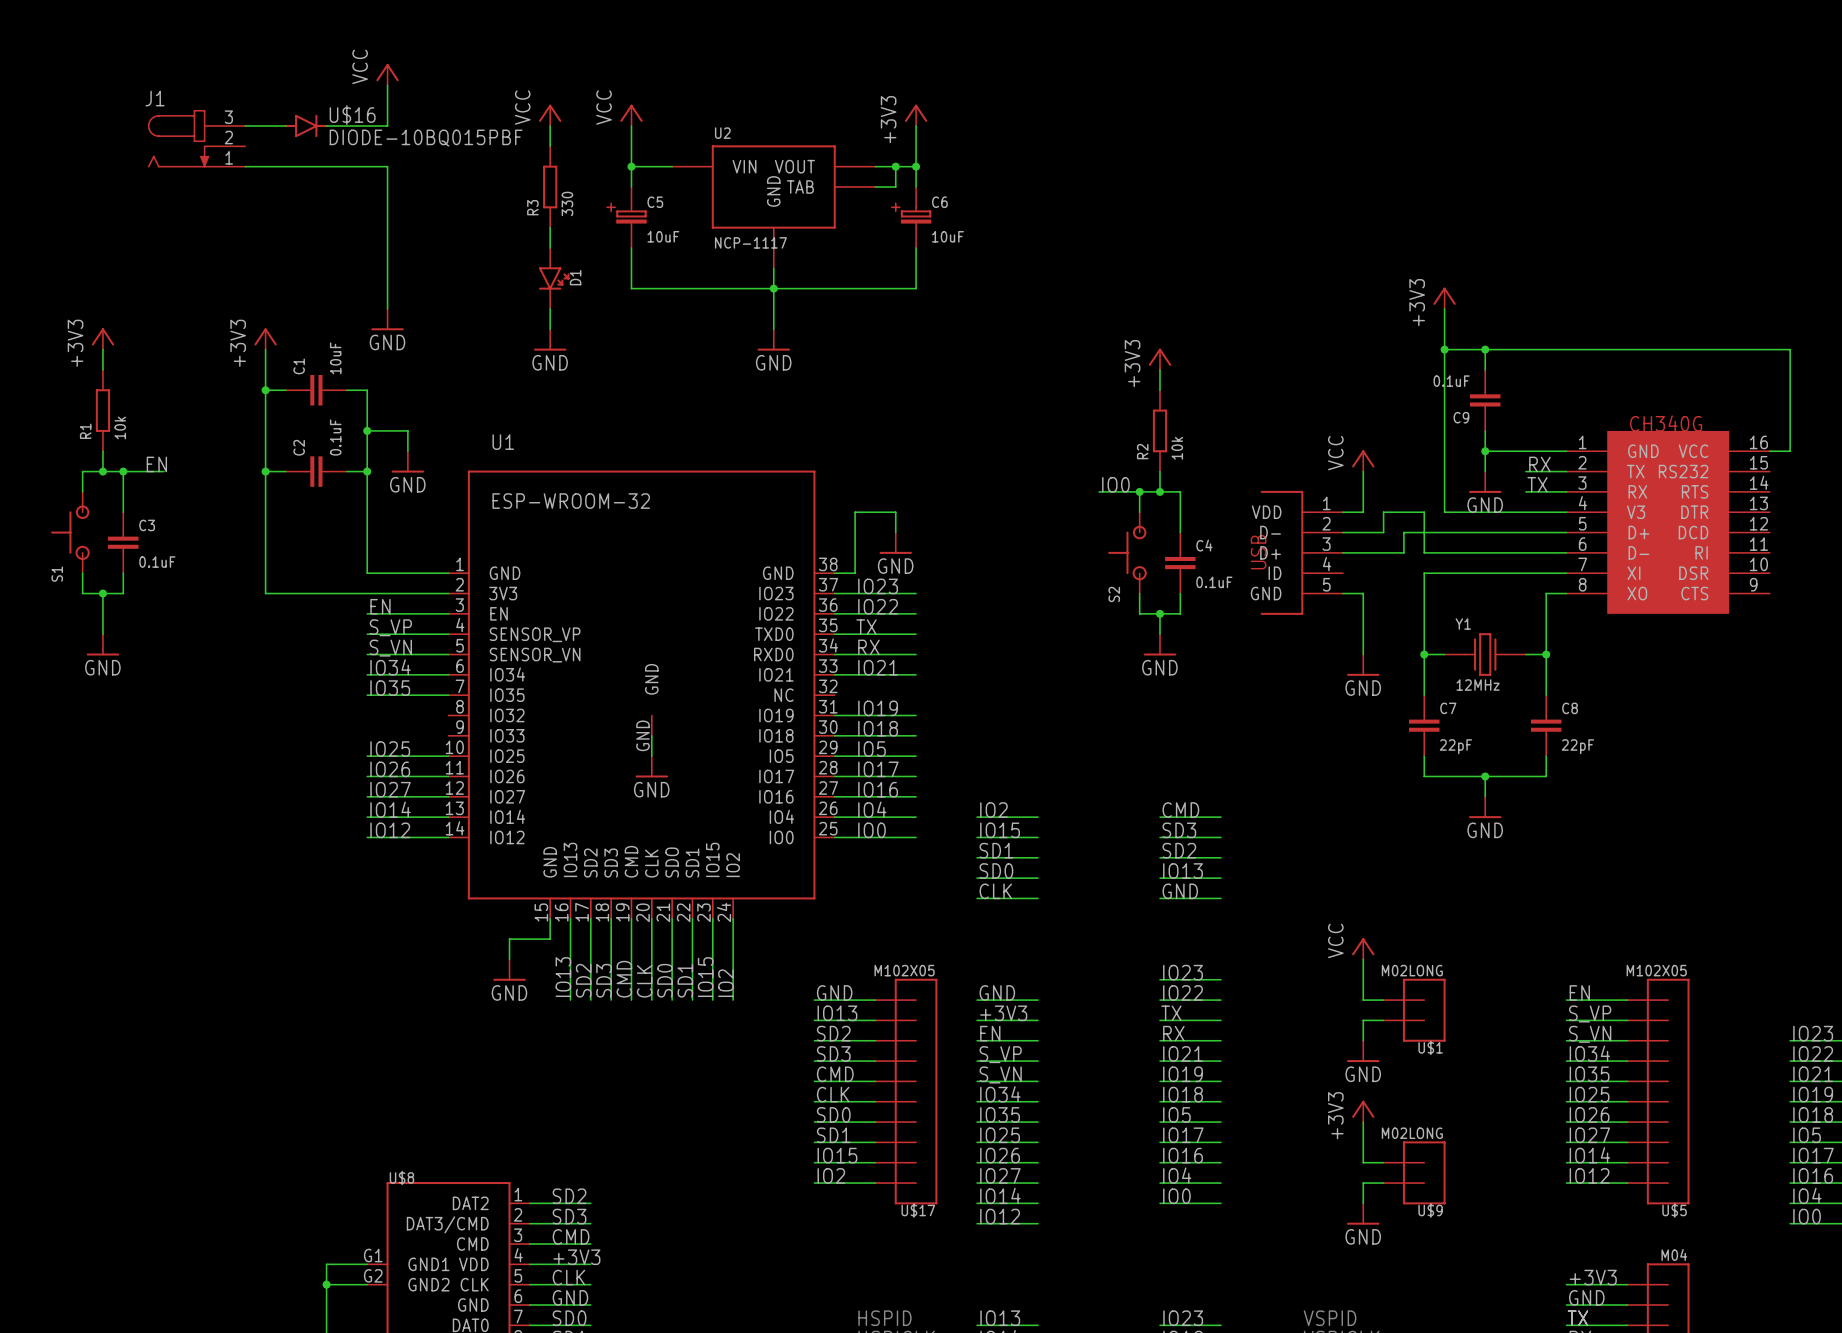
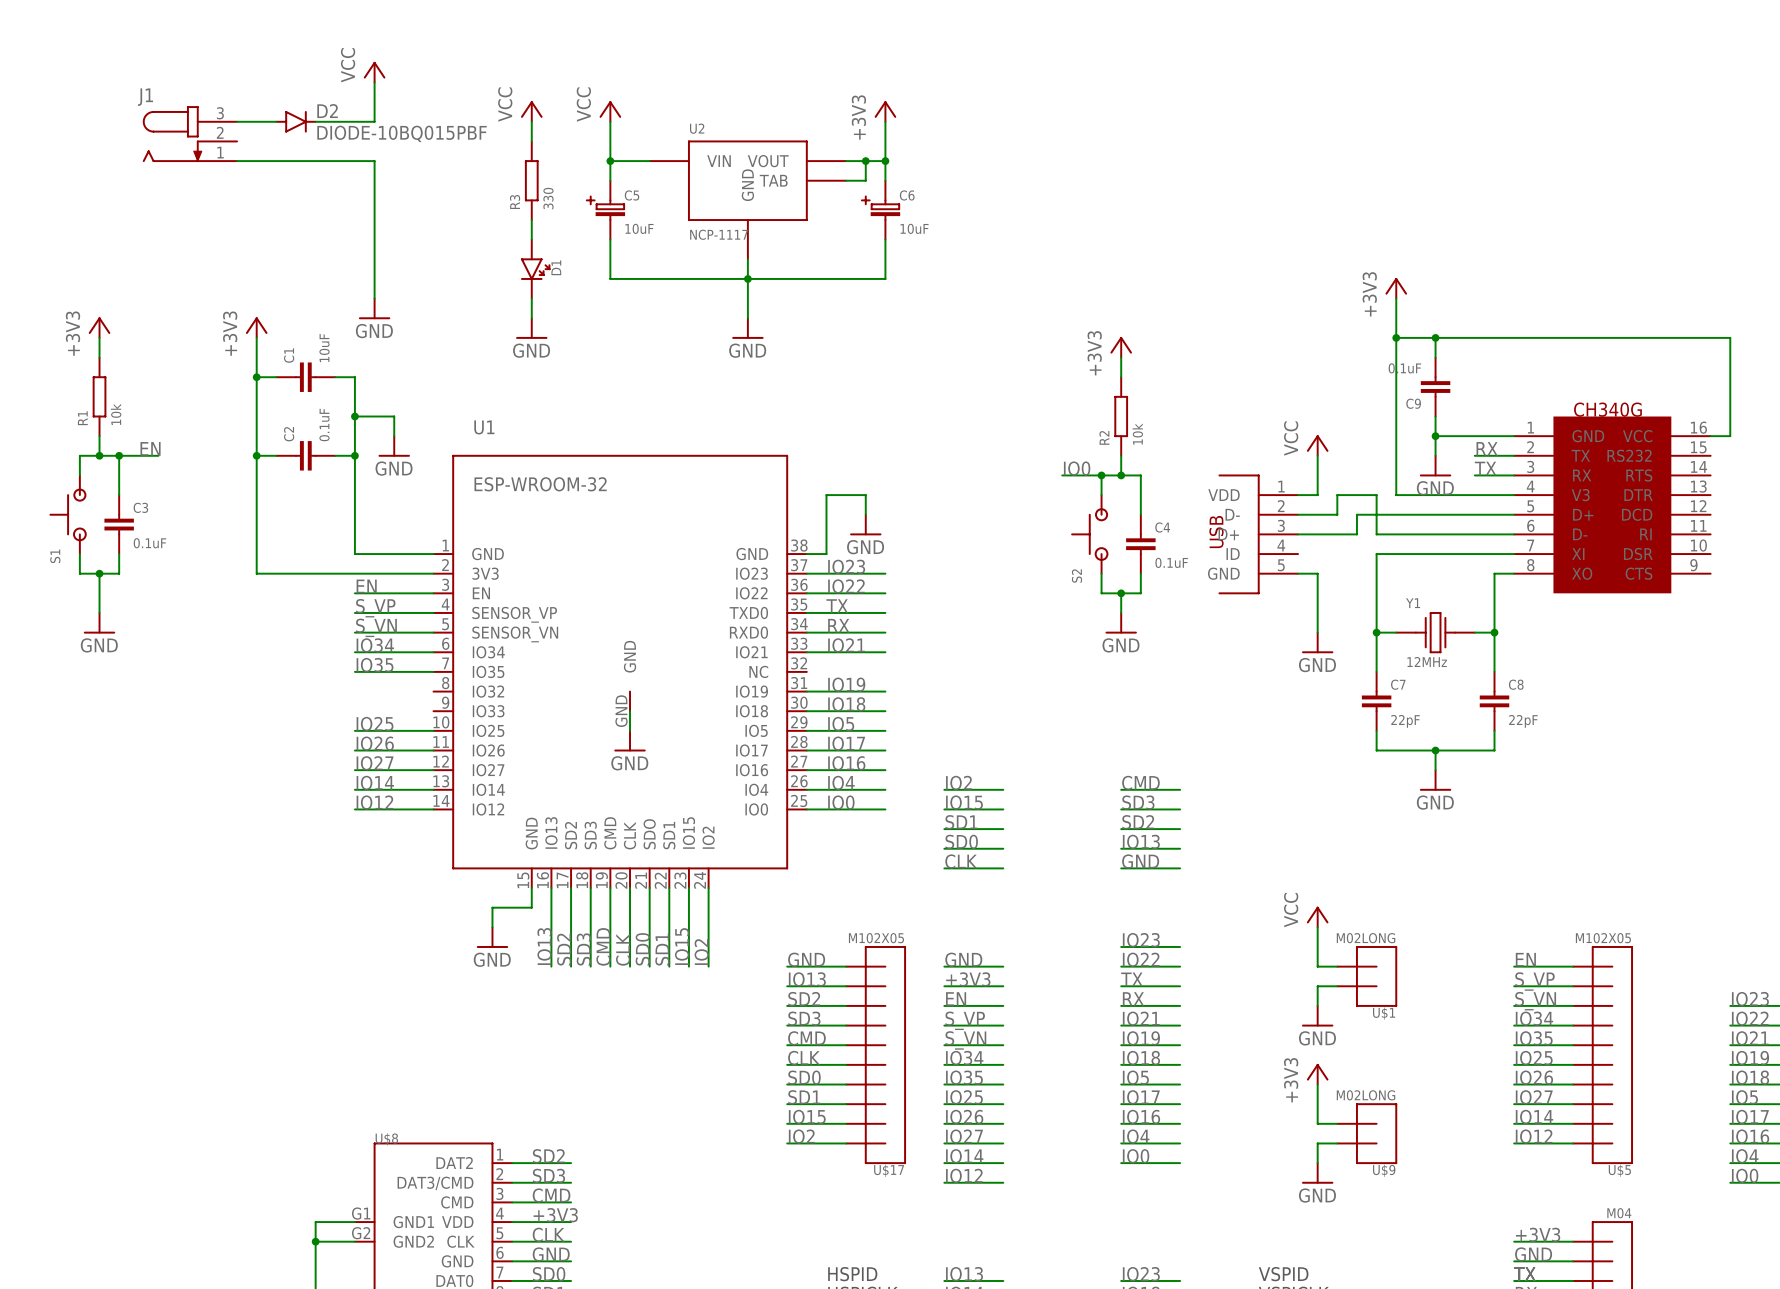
U$16 name: U$16 (352, 115) -> D2 (327, 111)

